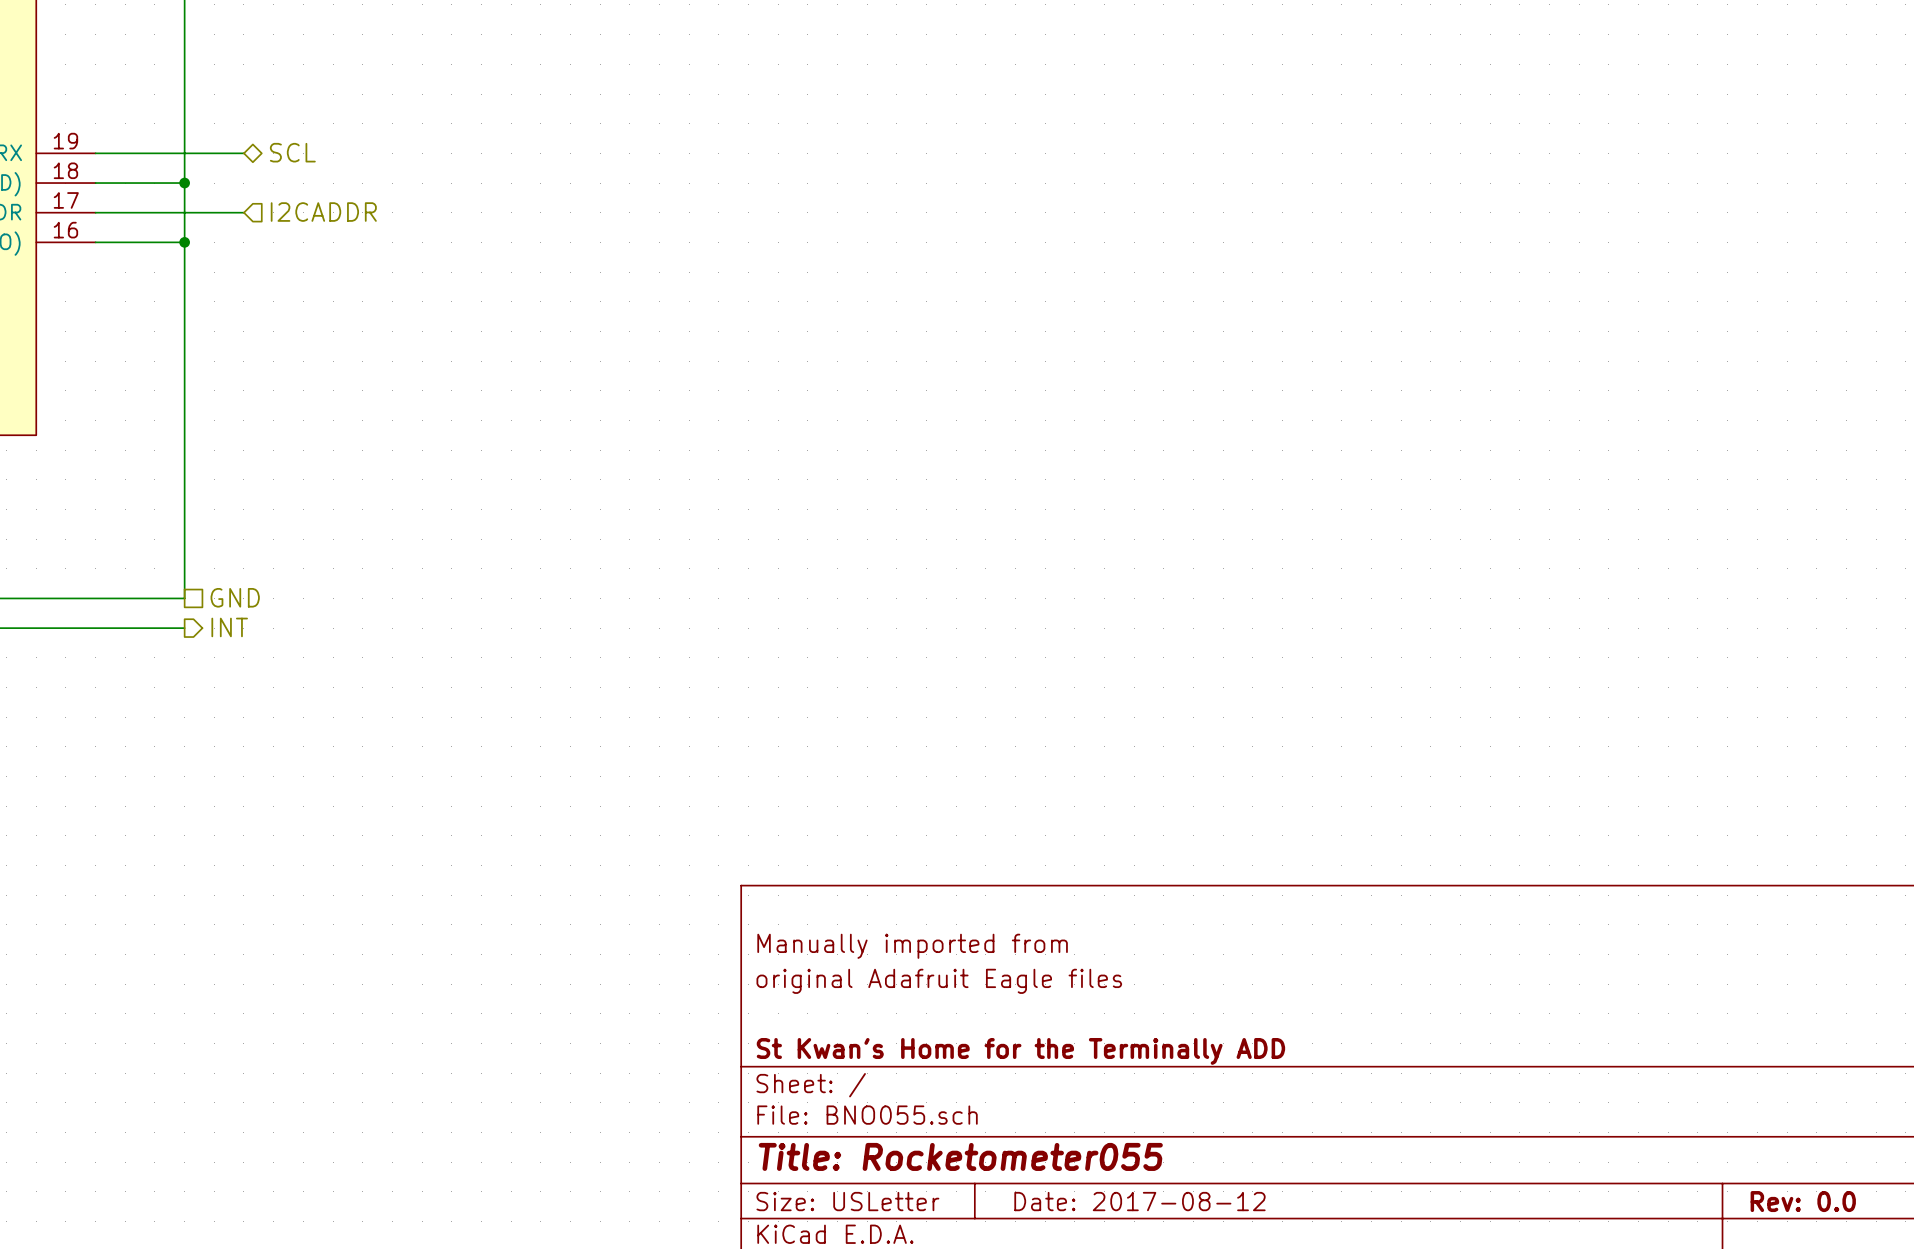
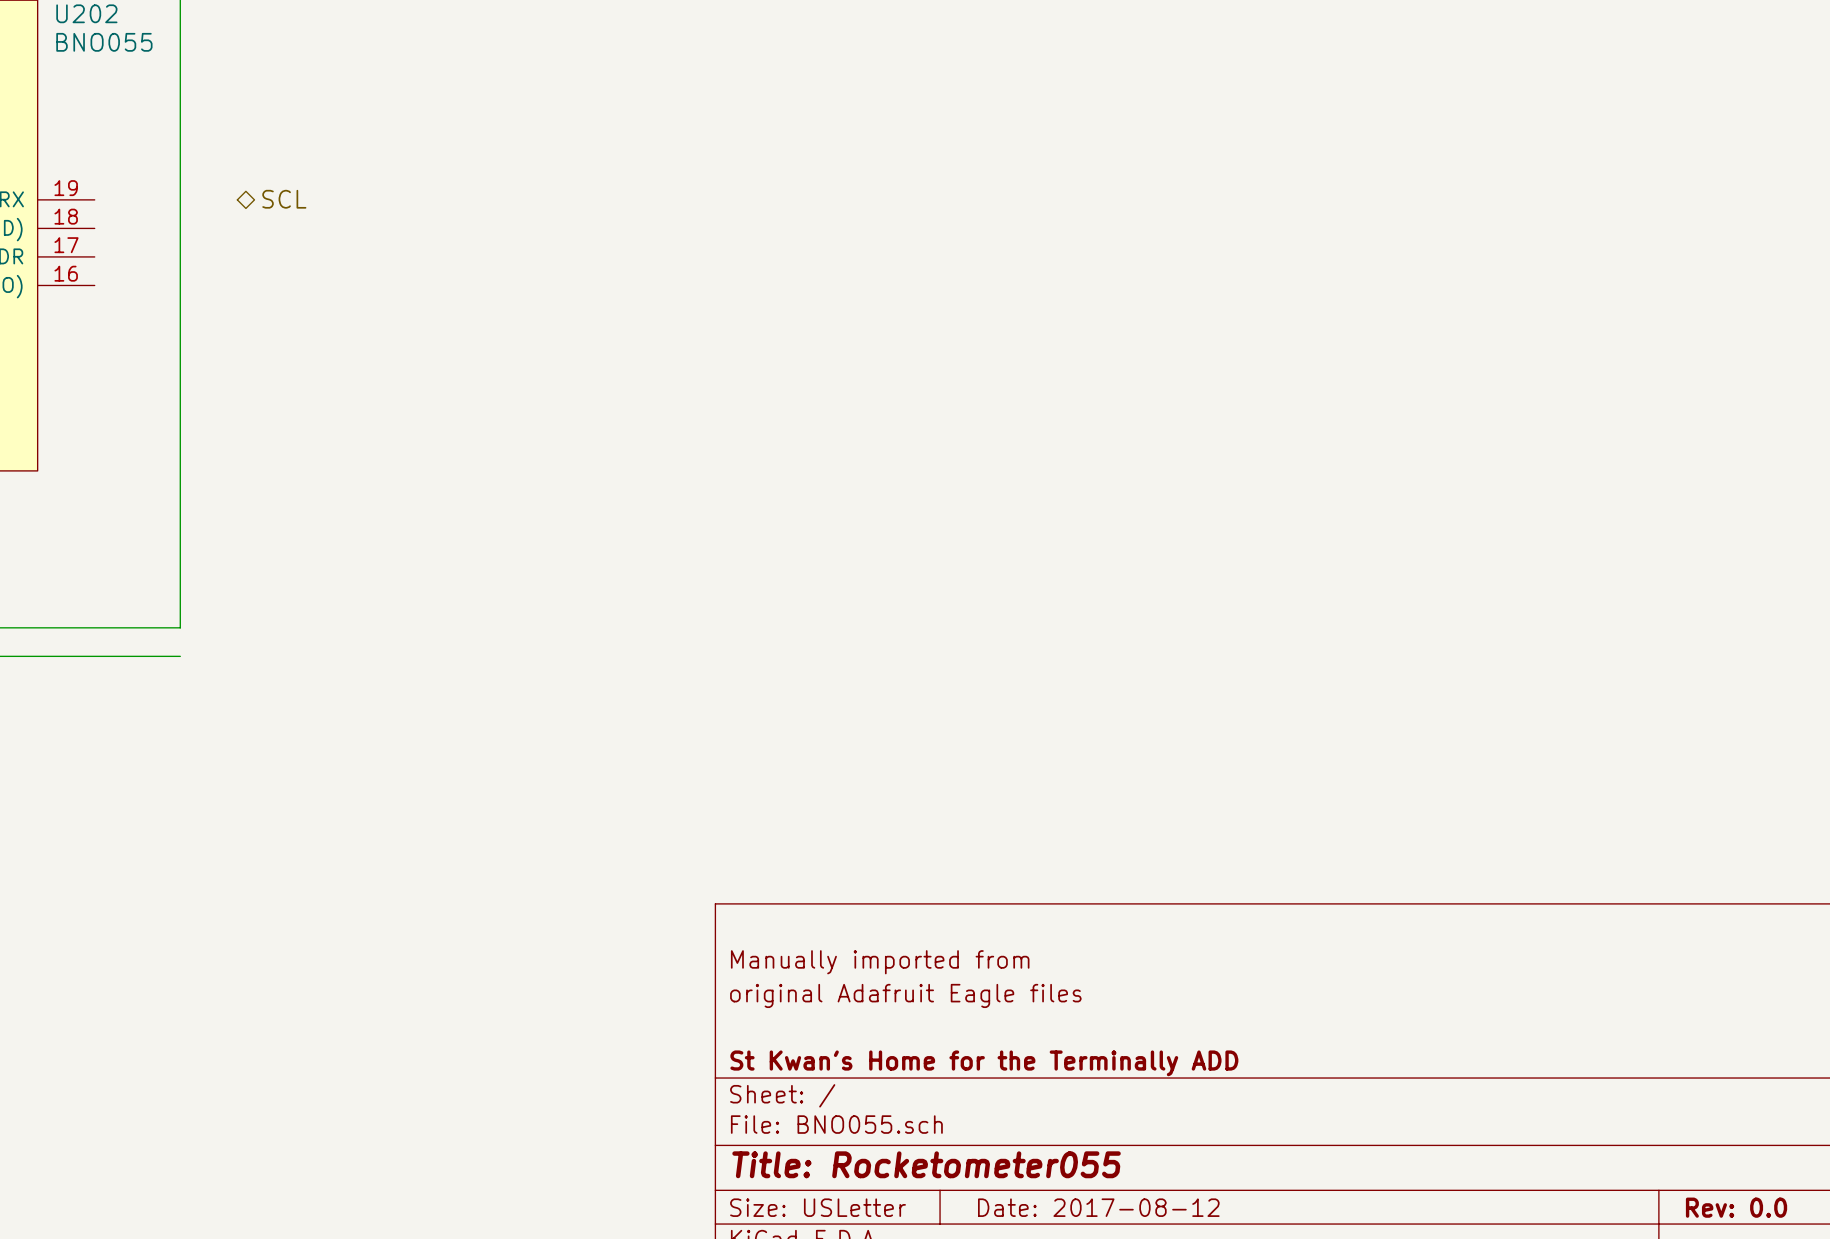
wire: (95, 153) (243, 153) -> none
wire: (95, 183) (184, 183) -> none
junction: (184, 183) -> none
wire: (95, 212) (243, 212) -> none
hierarchical label: I2CADDR (323, 212) -> none
wire: (95, 242) (184, 242) -> none
junction: (184, 242) -> none
hierarchical label: GND (235, 597) -> none
hierarchical label: INT (229, 627) -> none

